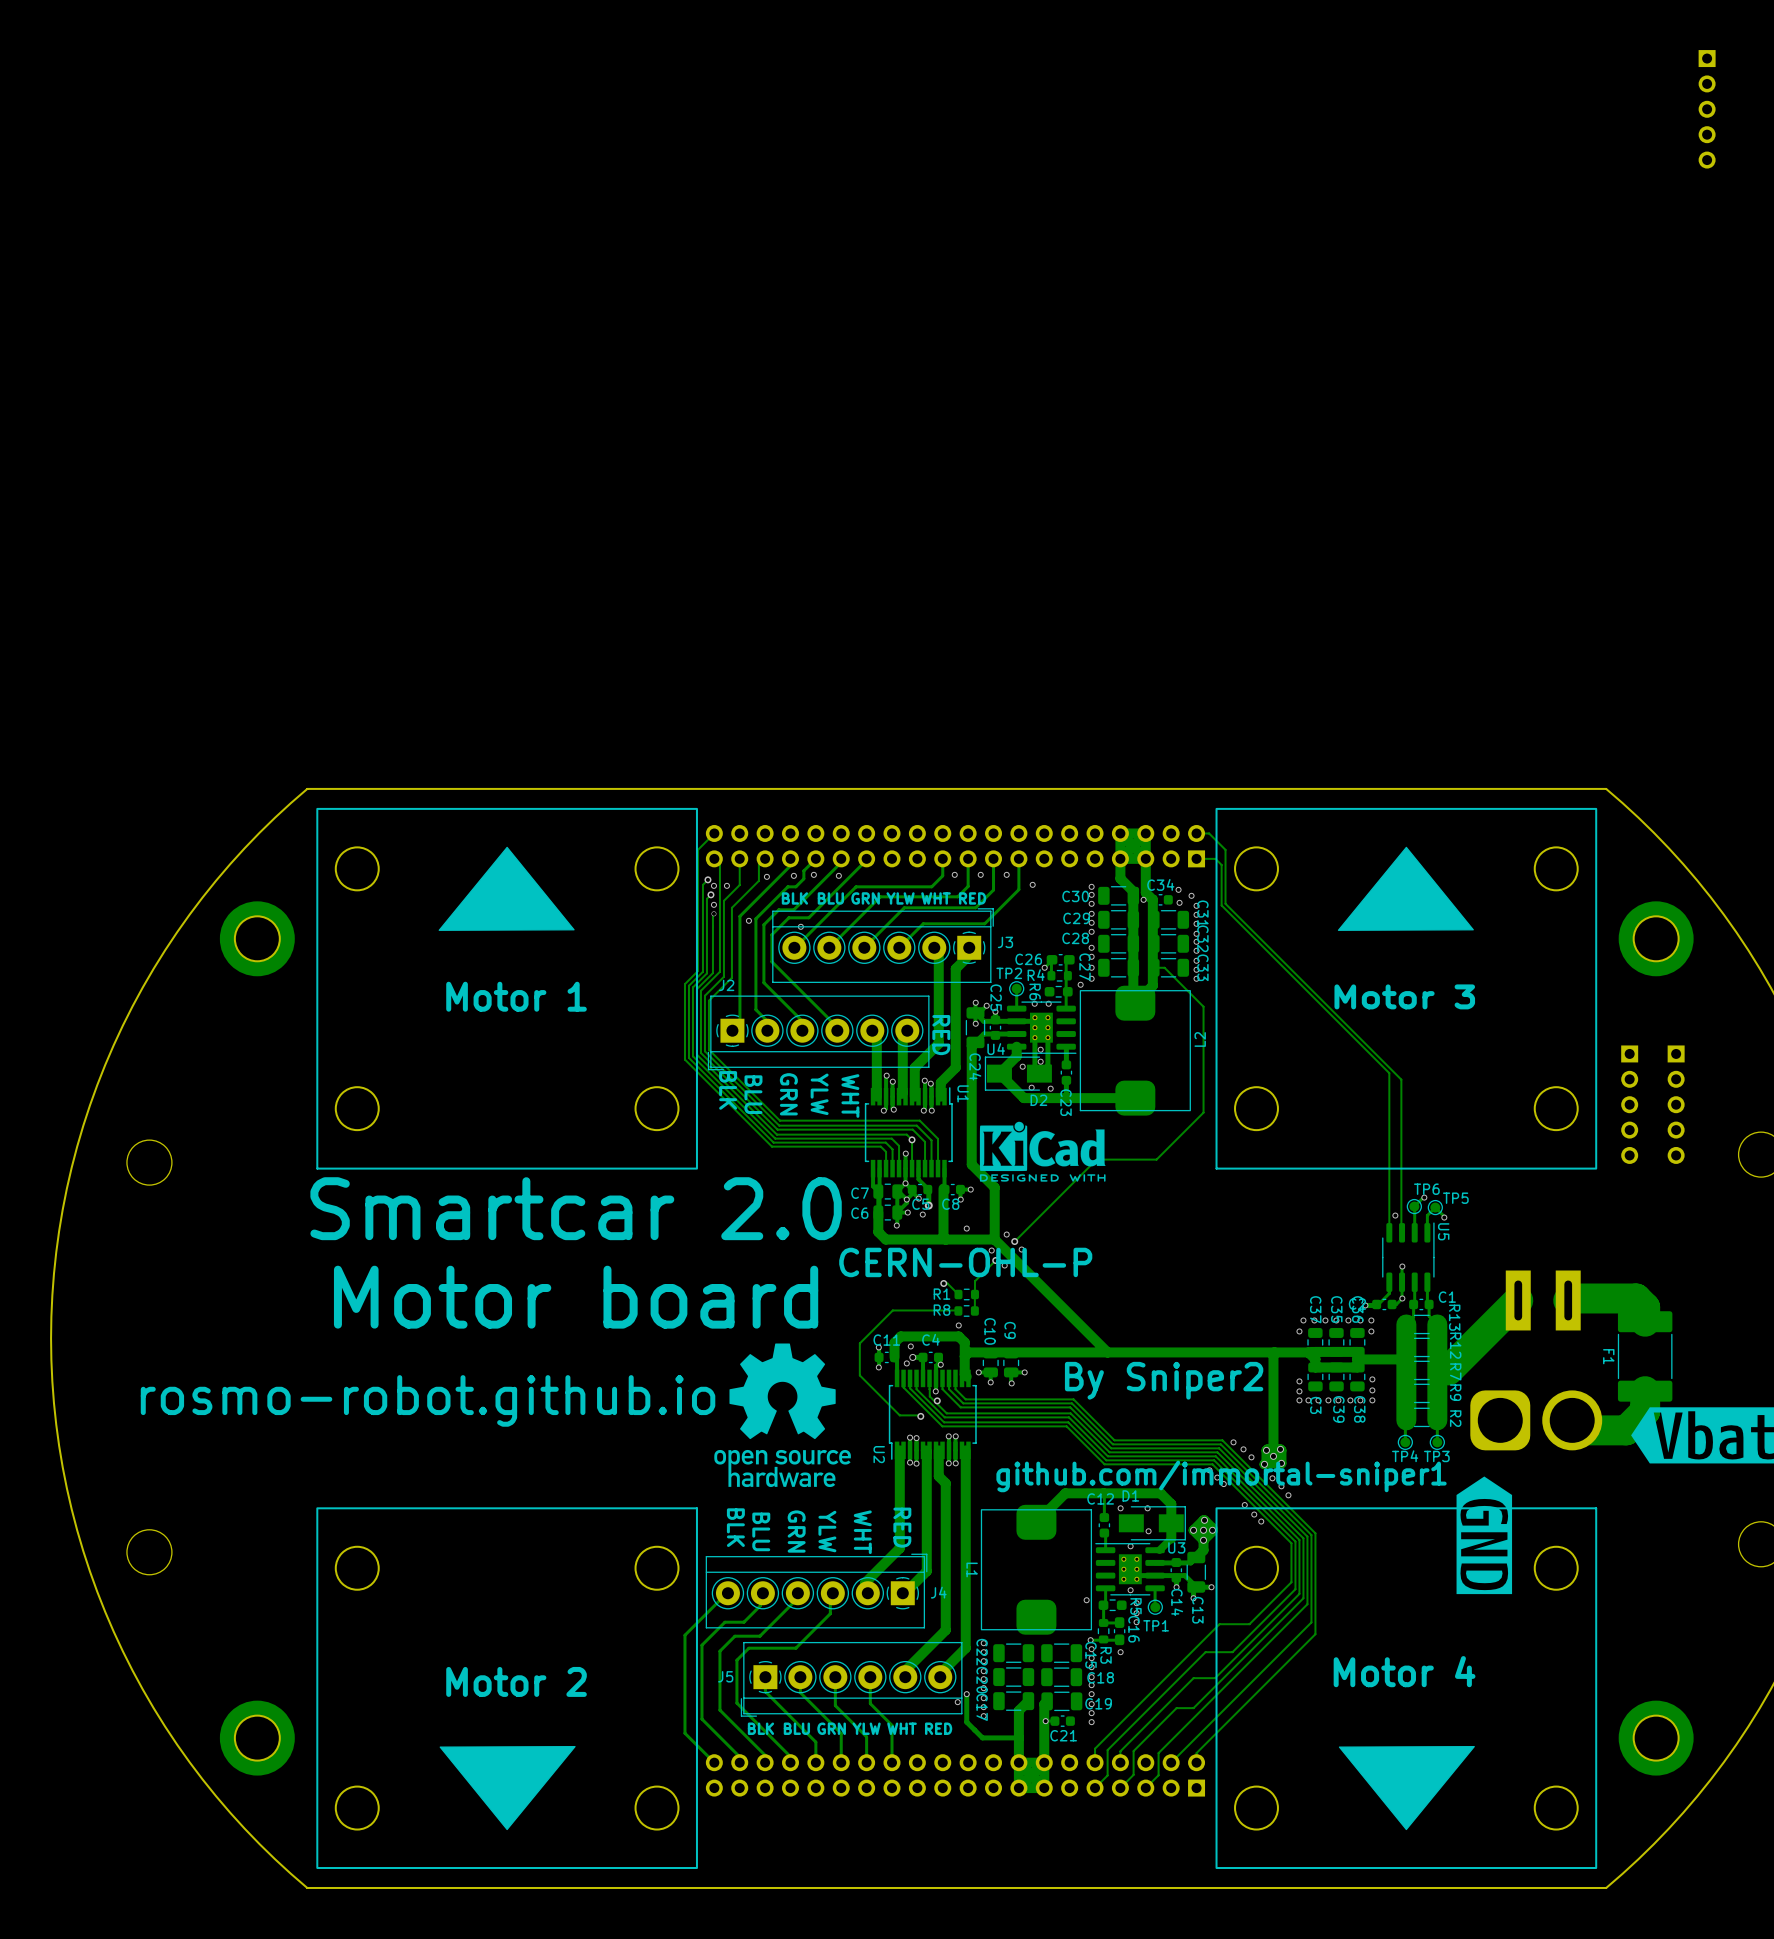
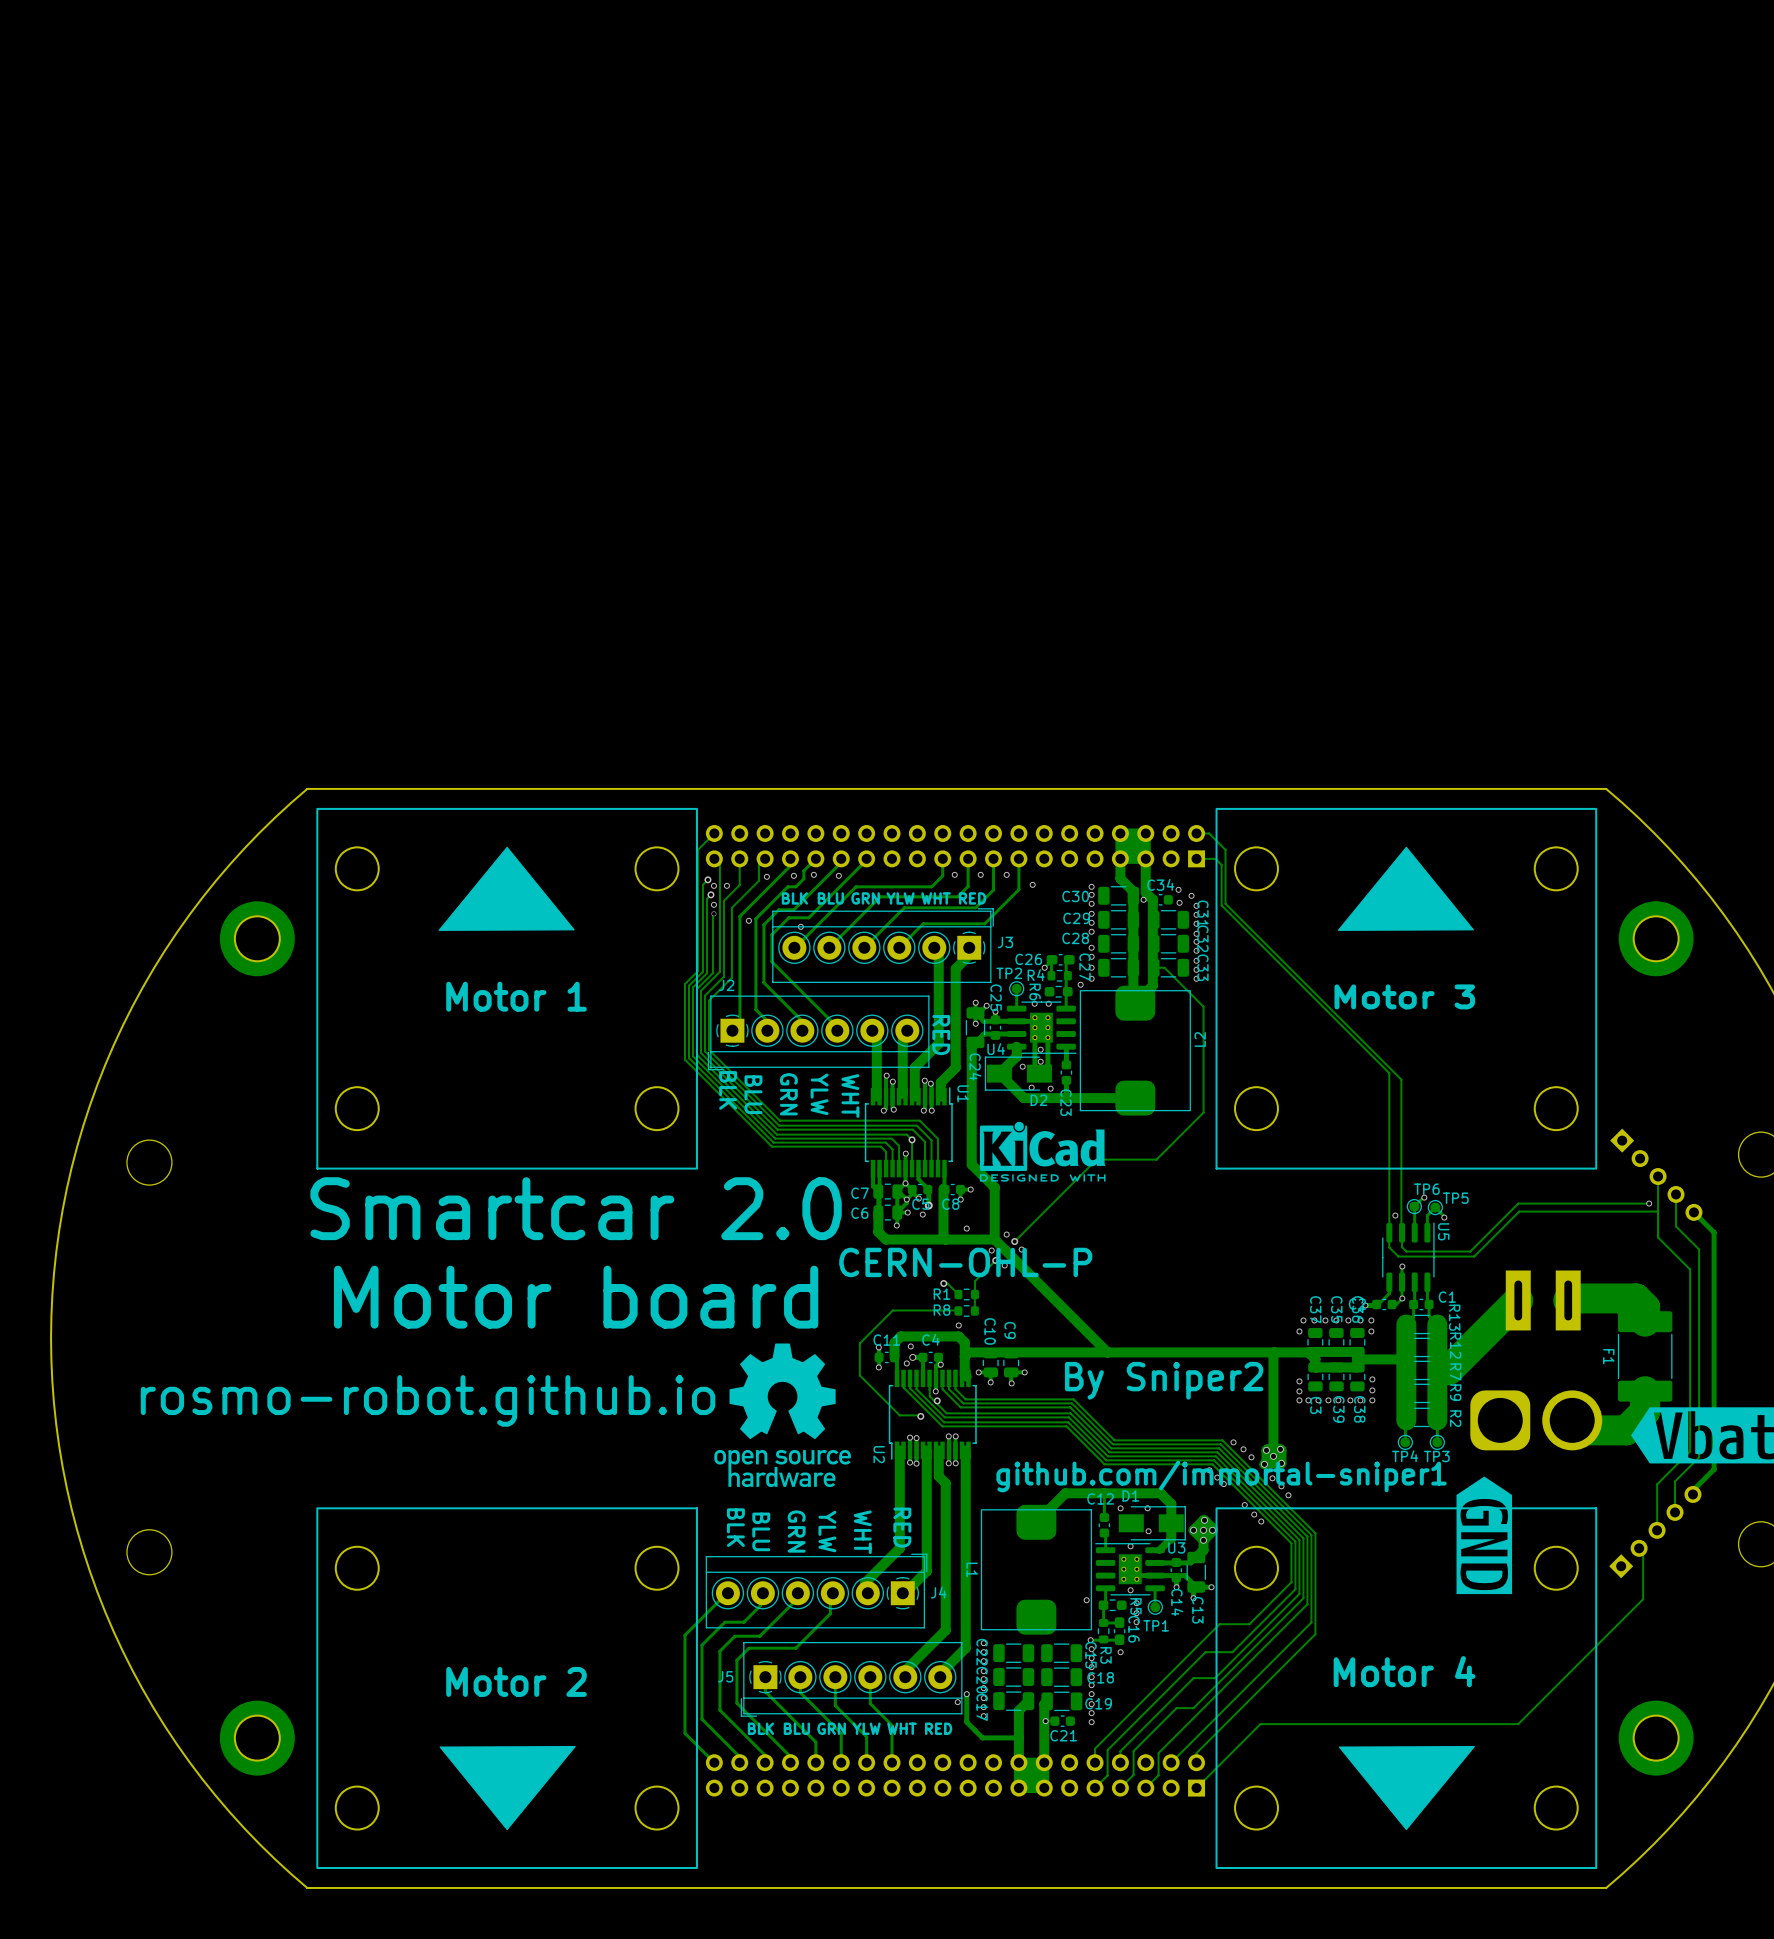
part: (1707, 109) -> none
part: (1629, 1104) -> none
part: (1676, 1104) -> none
part: none -> (1656, 1174)
track: none -> (1658, 1176) (1658, 1237) (1690, 1269) (1690, 1451) (1657, 1484) (1657, 1530)
track: none -> (1676, 1194) (1676, 1226) (1699, 1249) (1699, 1457) (1675, 1481) (1675, 1512)
track: none -> (1649, 1203) (1518, 1203) (1470, 1251) (1406, 1251) (1402, 1247) (1402, 1232)
via: none -> (1649, 1203)
track: none -> (1658, 1211) (1519, 1211) (1474, 1256) (1398, 1256) (1389, 1247) (1389, 1232)
track: none -> (1693, 1212) (1714, 1232) (1714, 1469) (1692, 1490) (1692, 1494)
part: none -> (1655, 1532)
track: none -> (1639, 1548) (1643, 1552) (1643, 1599) (1518, 1724) (1260, 1724) (1196, 1788)

